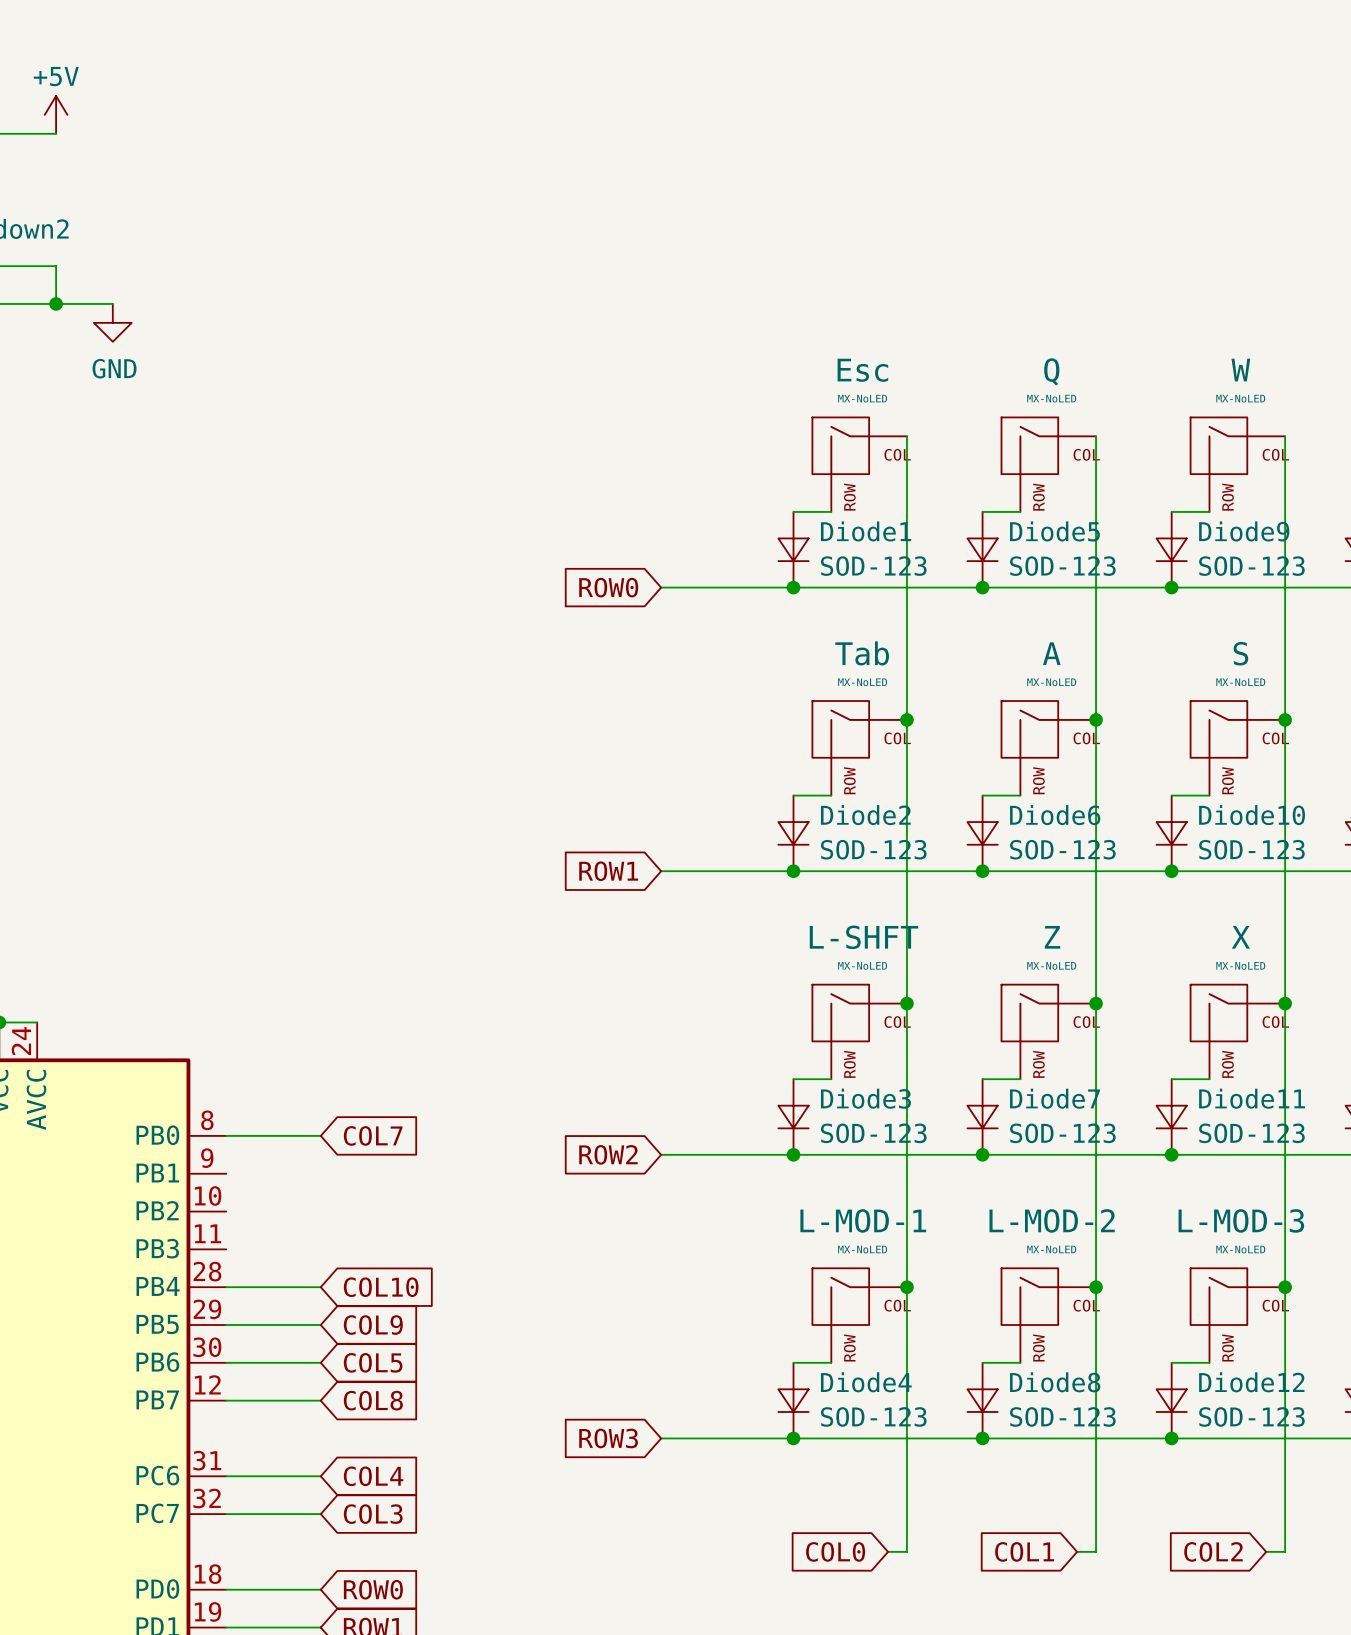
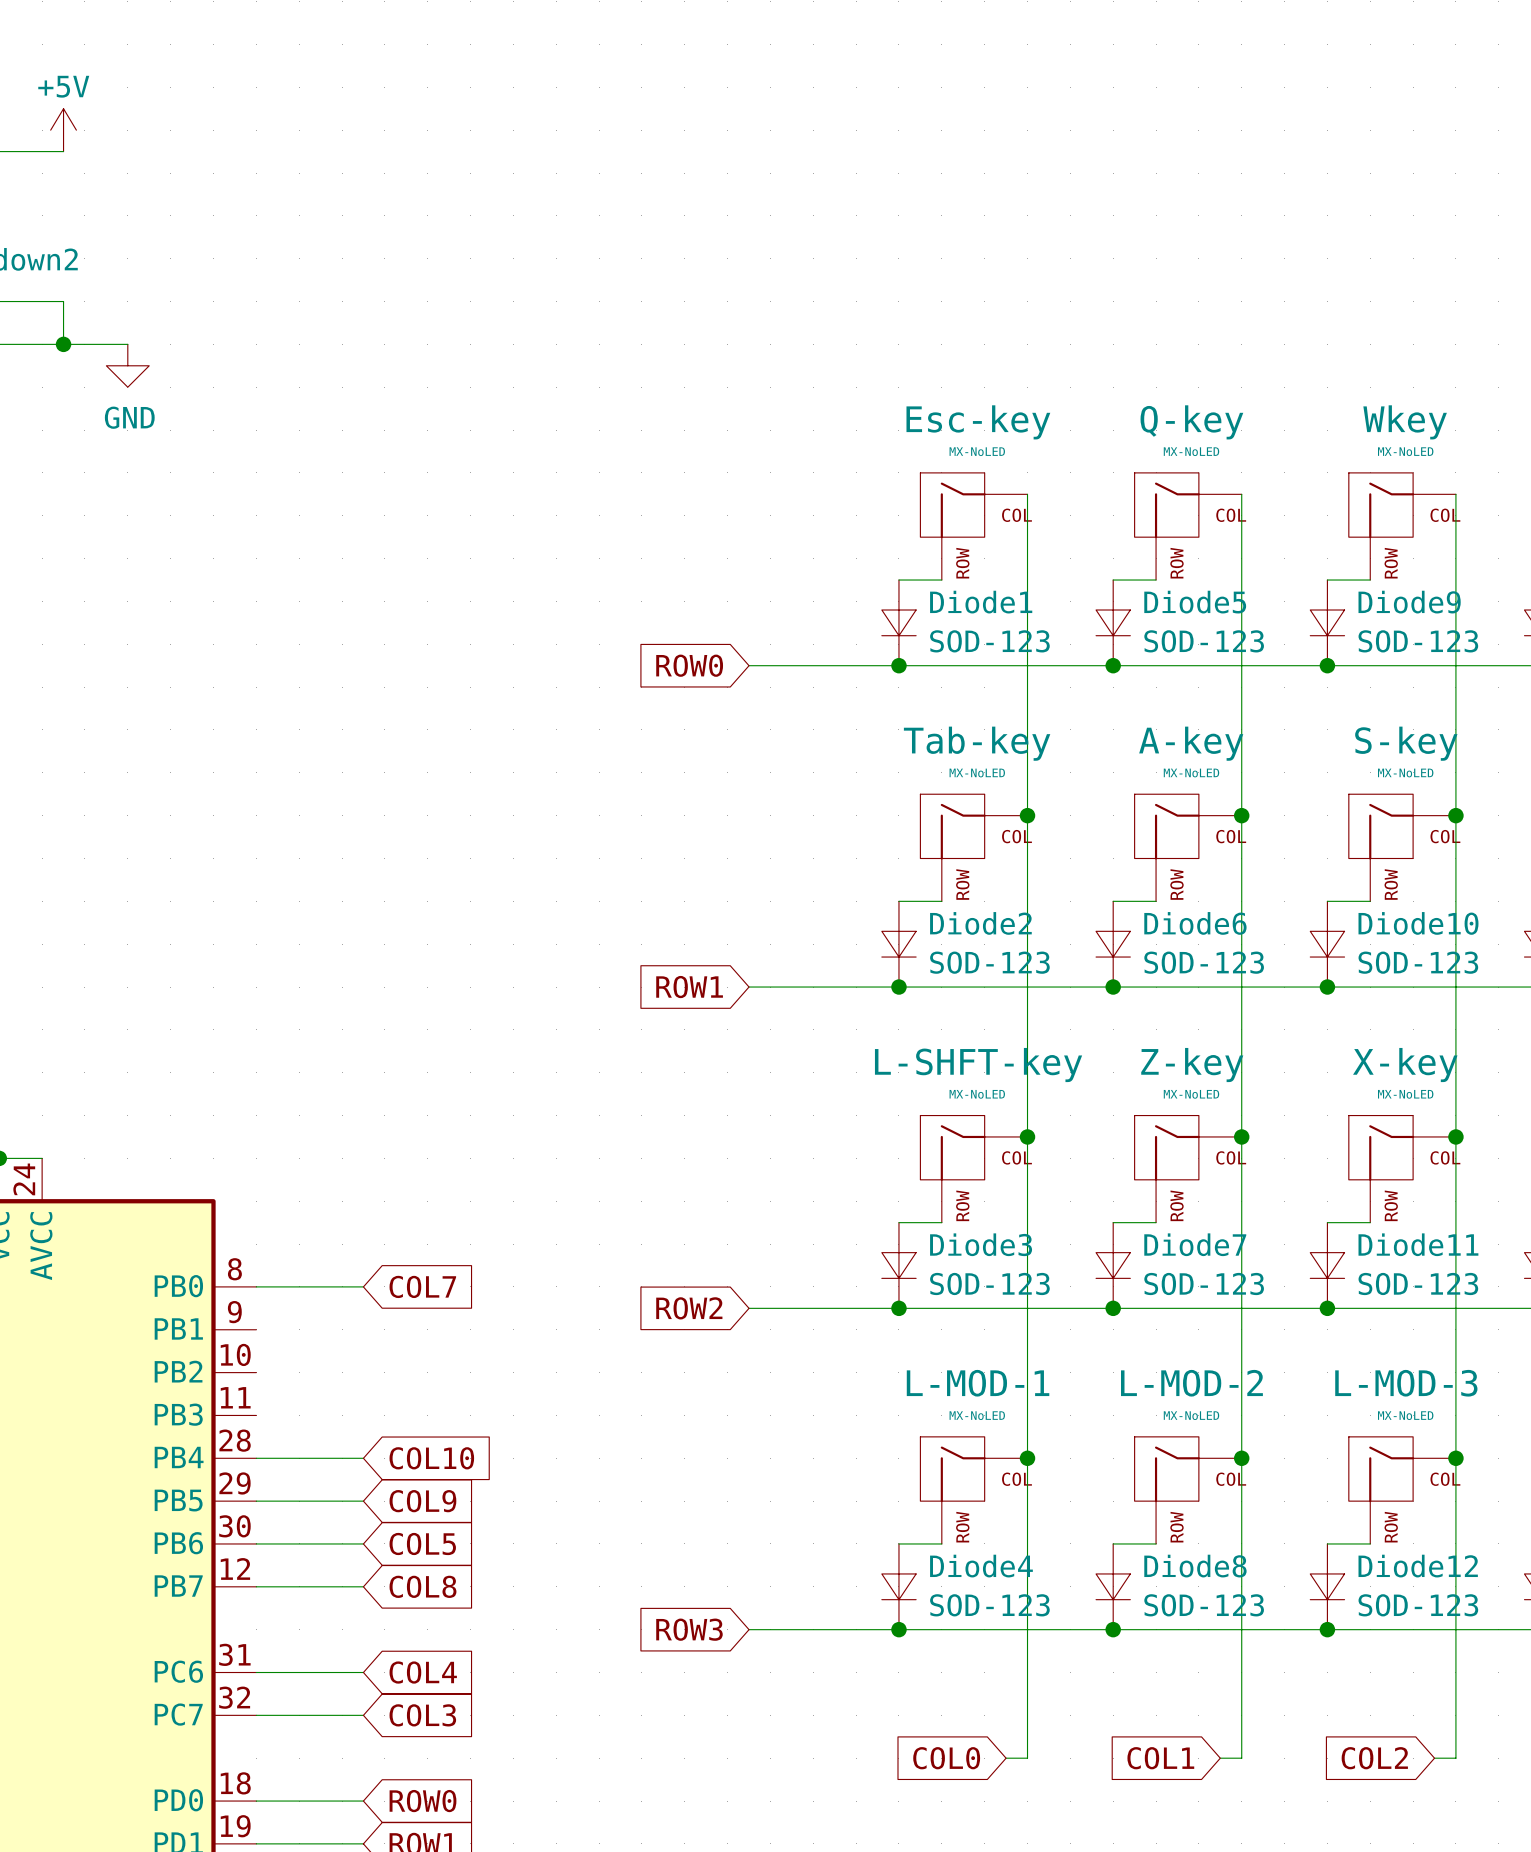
Esc name: Esc (862, 370) -> Esc-key (978, 422)
W name: W (1240, 370) -> Wkey (1405, 422)
Q name: Q (1051, 371) -> Q-key (1191, 422)
Tab name: Tab (862, 653) -> Tab-key (977, 743)
A name: A (1051, 653) -> A-key (1191, 743)
S name: S (1240, 653) -> S-key (1406, 743)
L-SHFT name: L-SHFT (863, 937) -> L-SHFT-key (978, 1065)
Z name: Z (1052, 937) -> Z-key (1192, 1065)
X name: X (1240, 937) -> X-key (1405, 1065)

